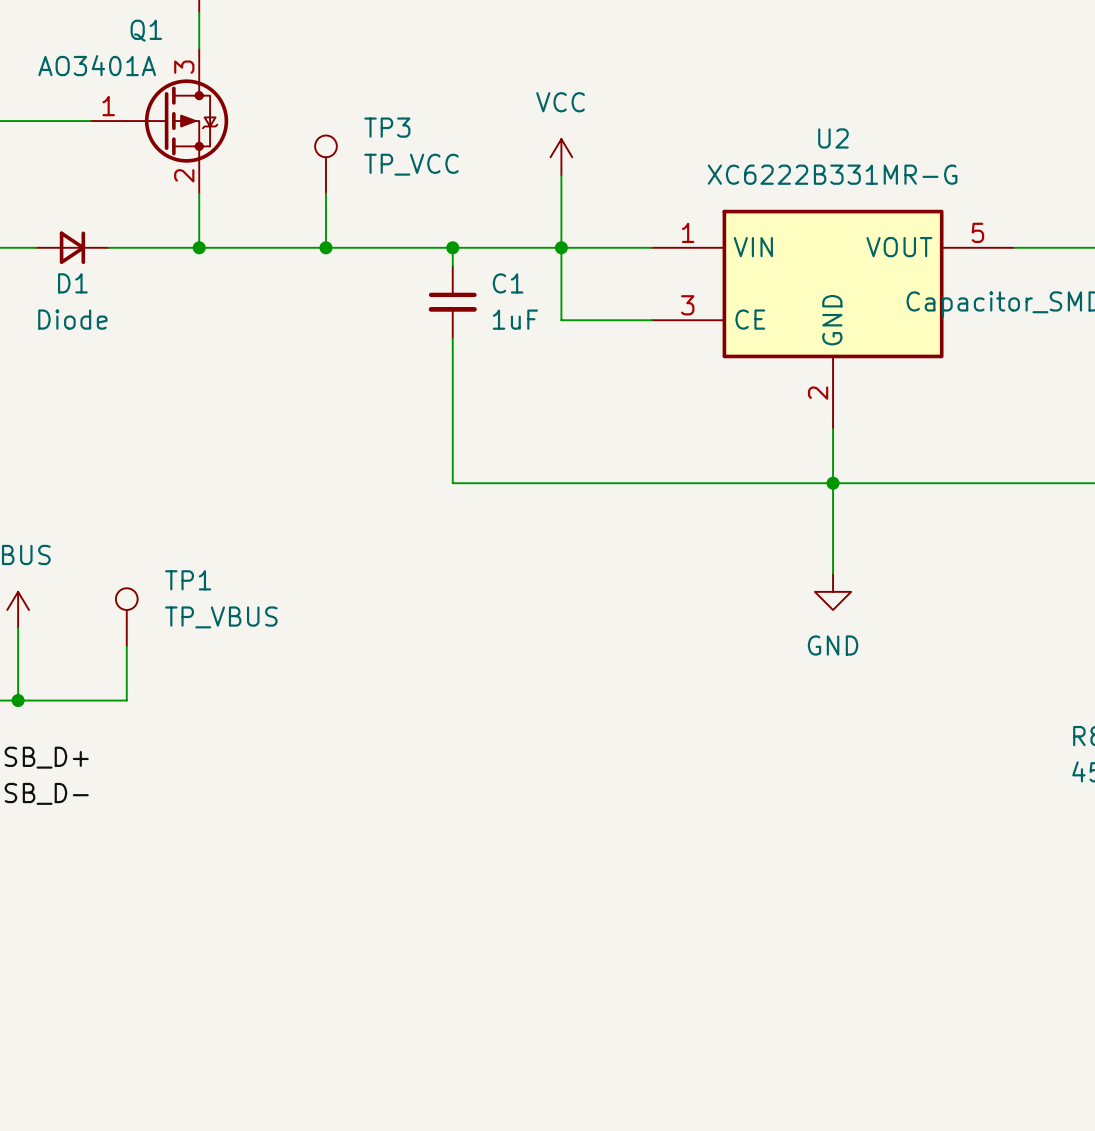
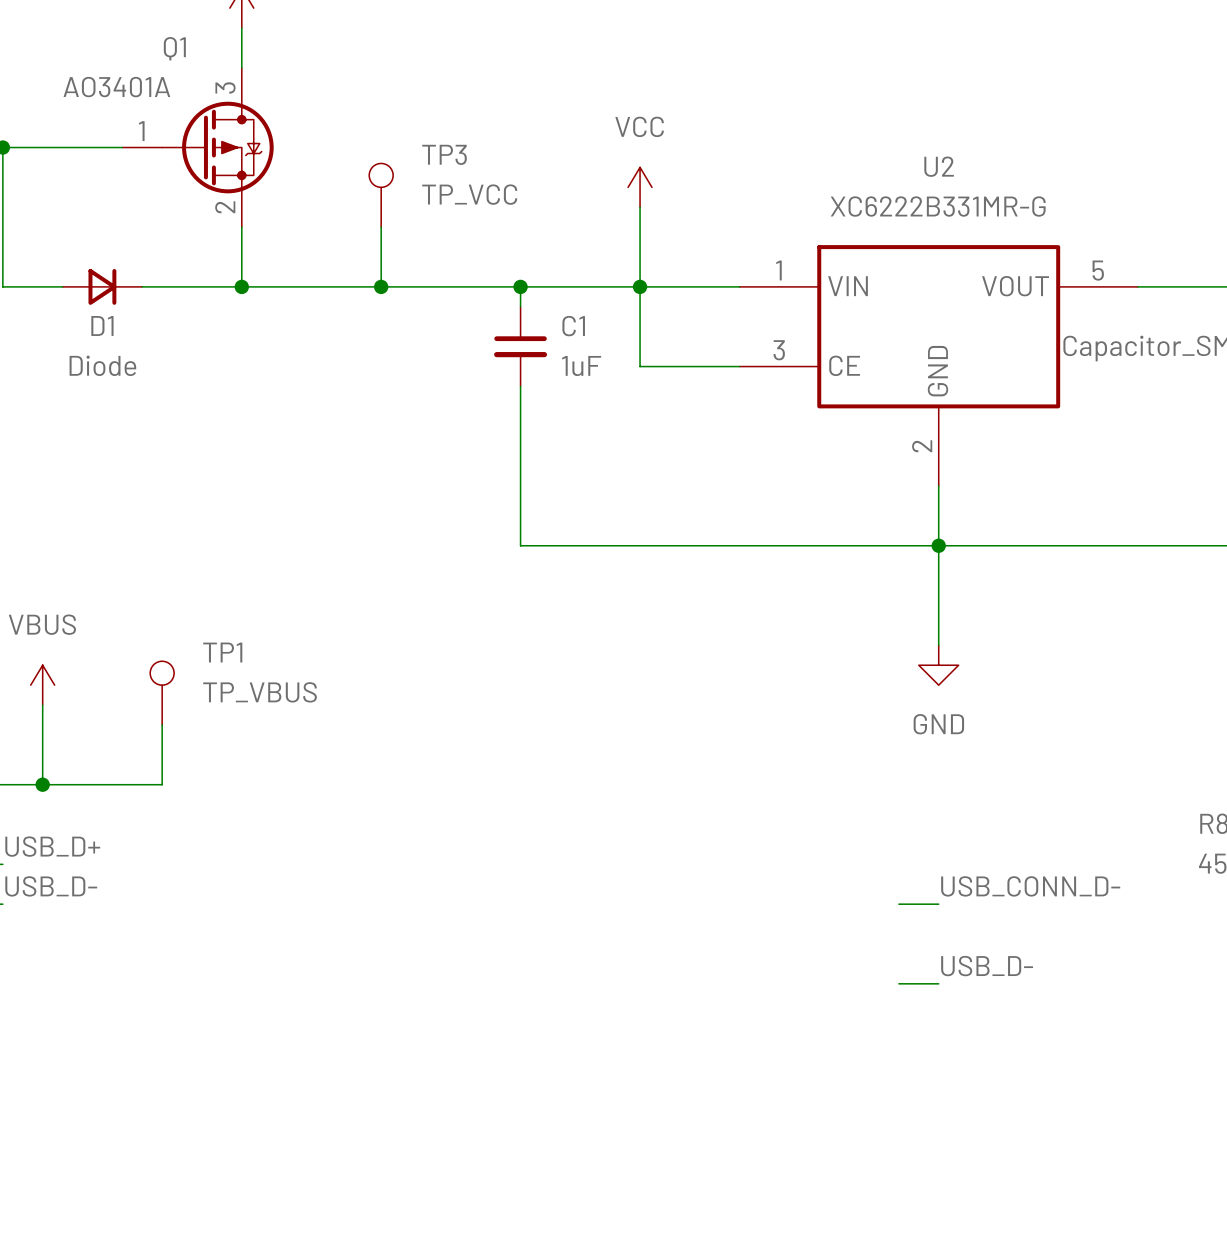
label: none -> USB_CONN_D- (1030, 886)
wire: none -> (898, 904) (938, 904)
label: none -> USB_D- (987, 966)
wire: none -> (898, 983) (938, 983)

